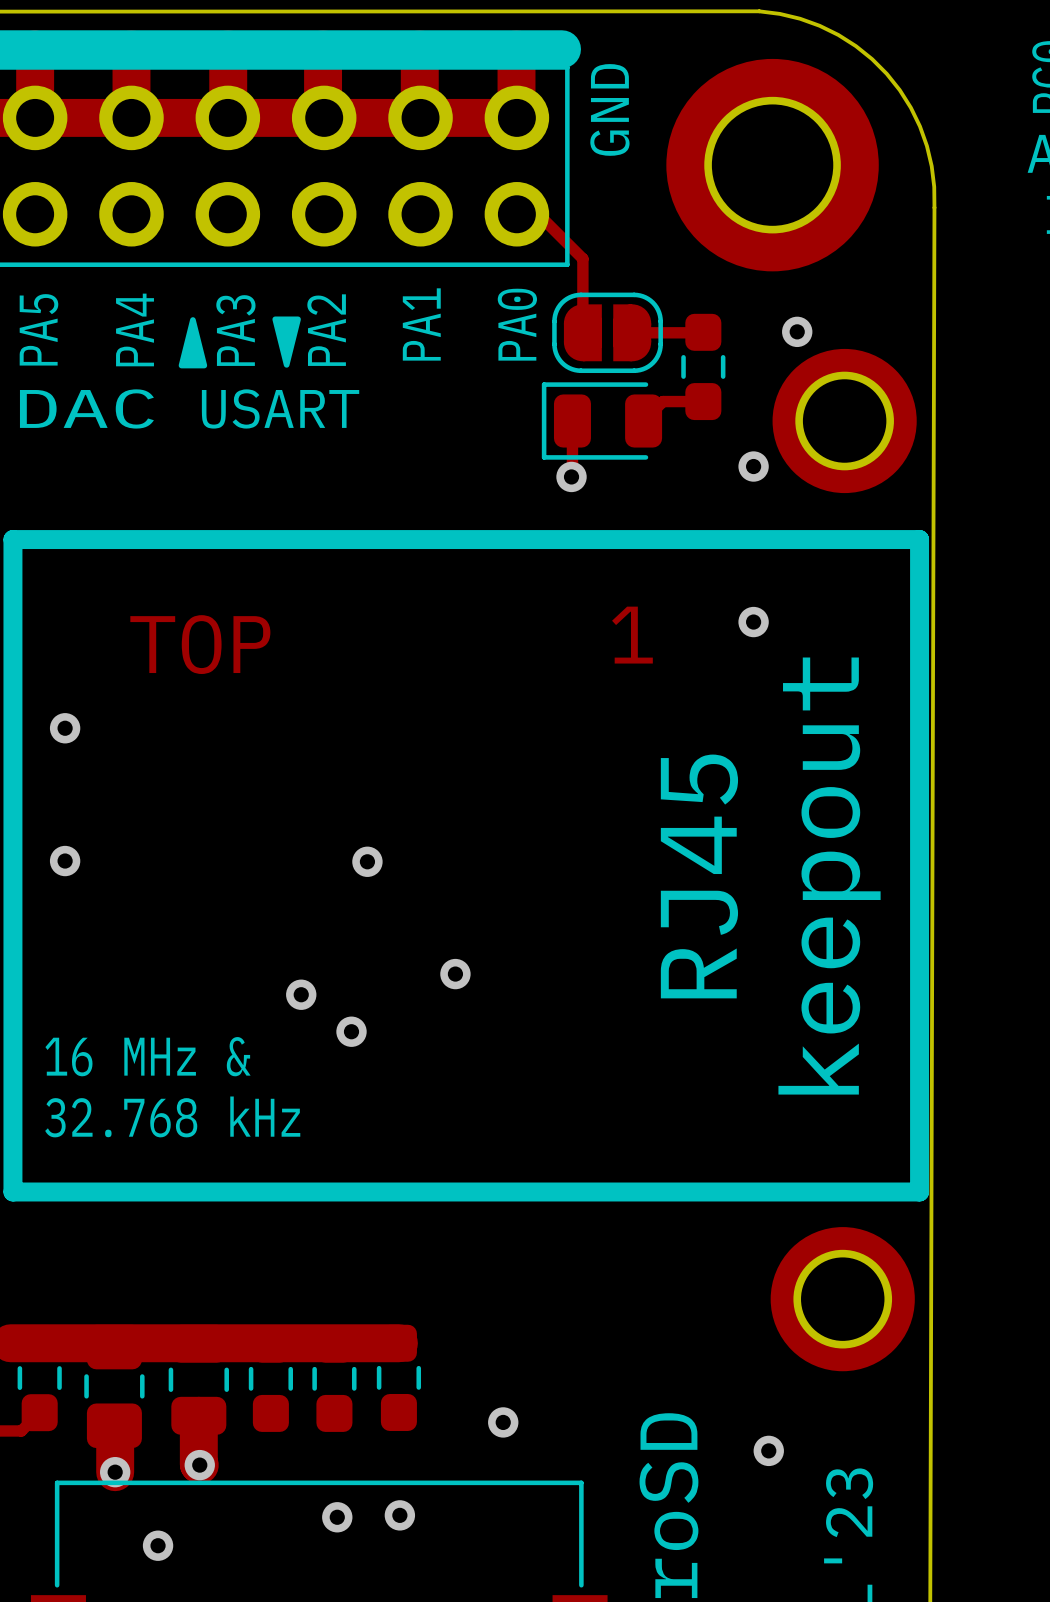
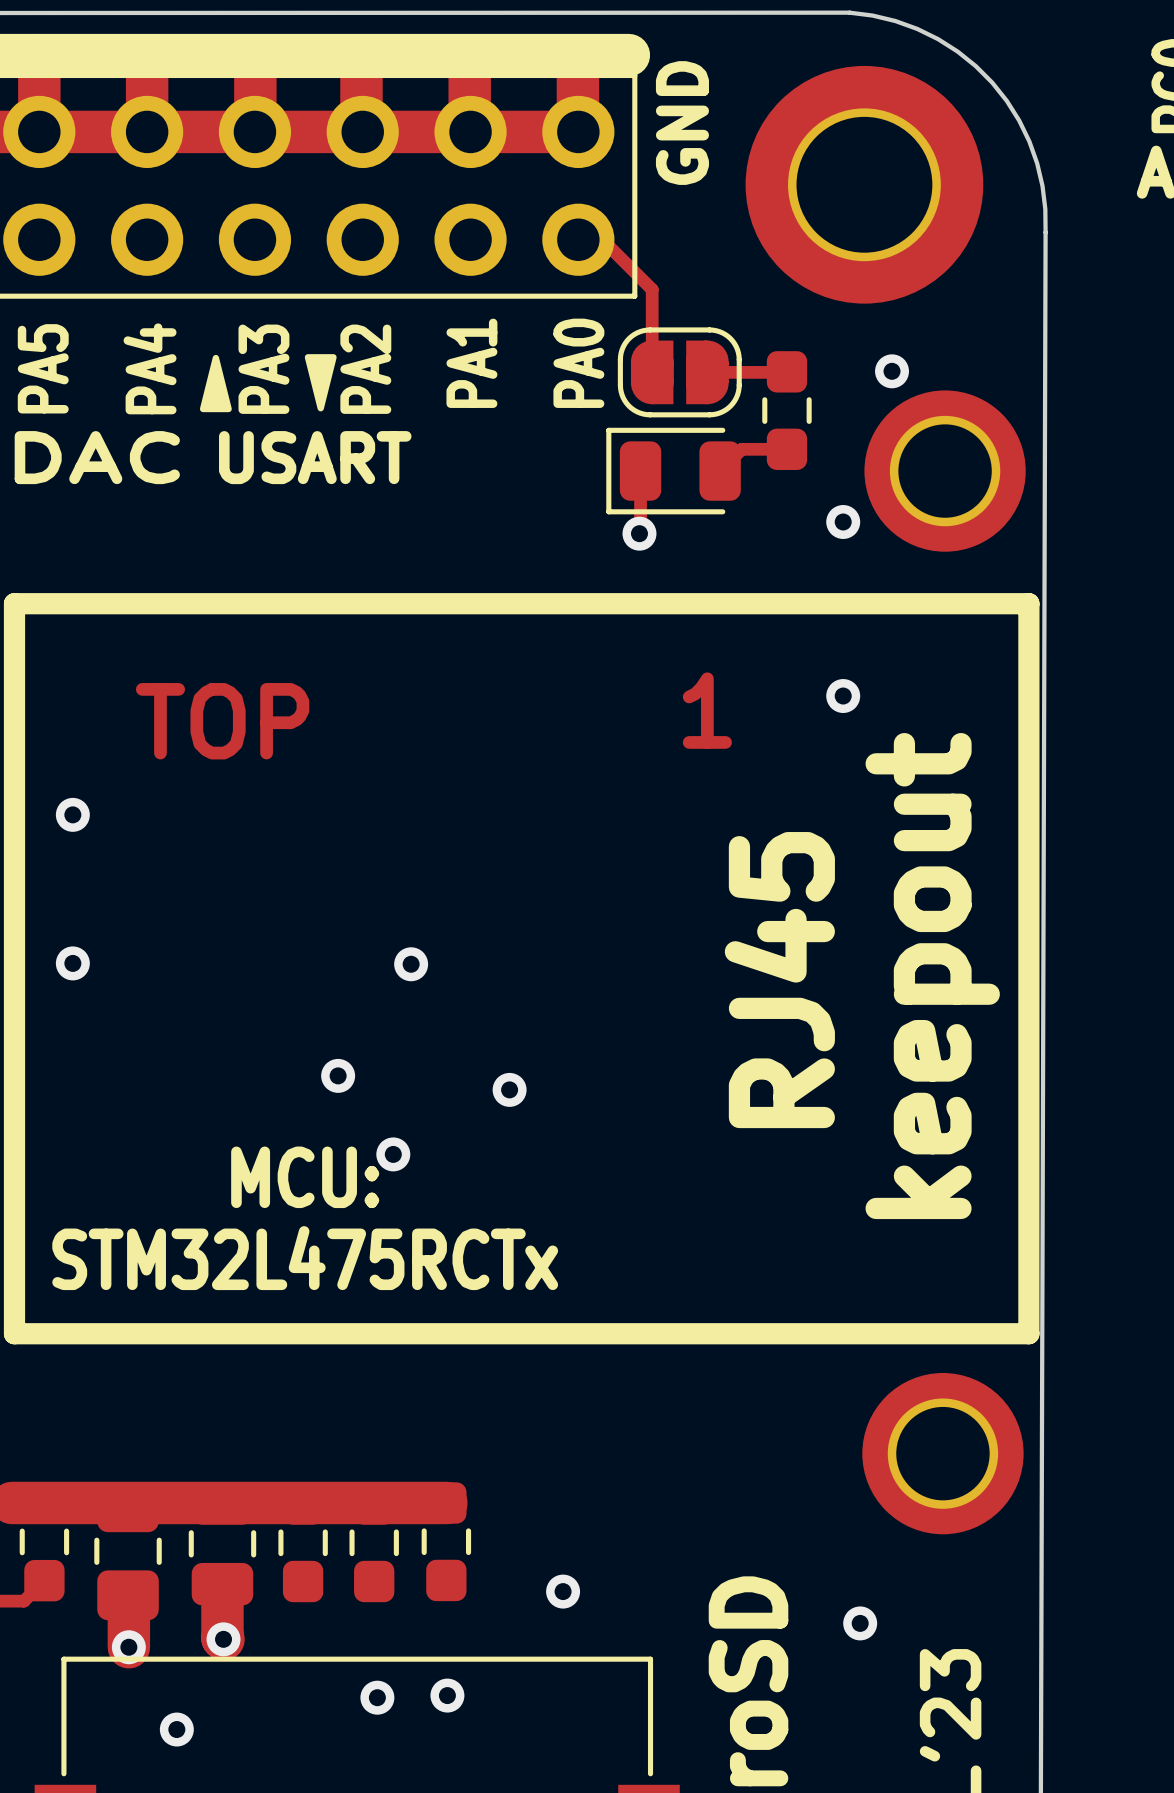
via position: (301, 994) -> (338, 1075)
text: none -> MCU: (305, 1177)
text: 16 MHz & (148, 1056) -> none
text: 32.768 kHz (172, 1116) -> none
text: none -> STM32L475RCTx (305, 1258)

